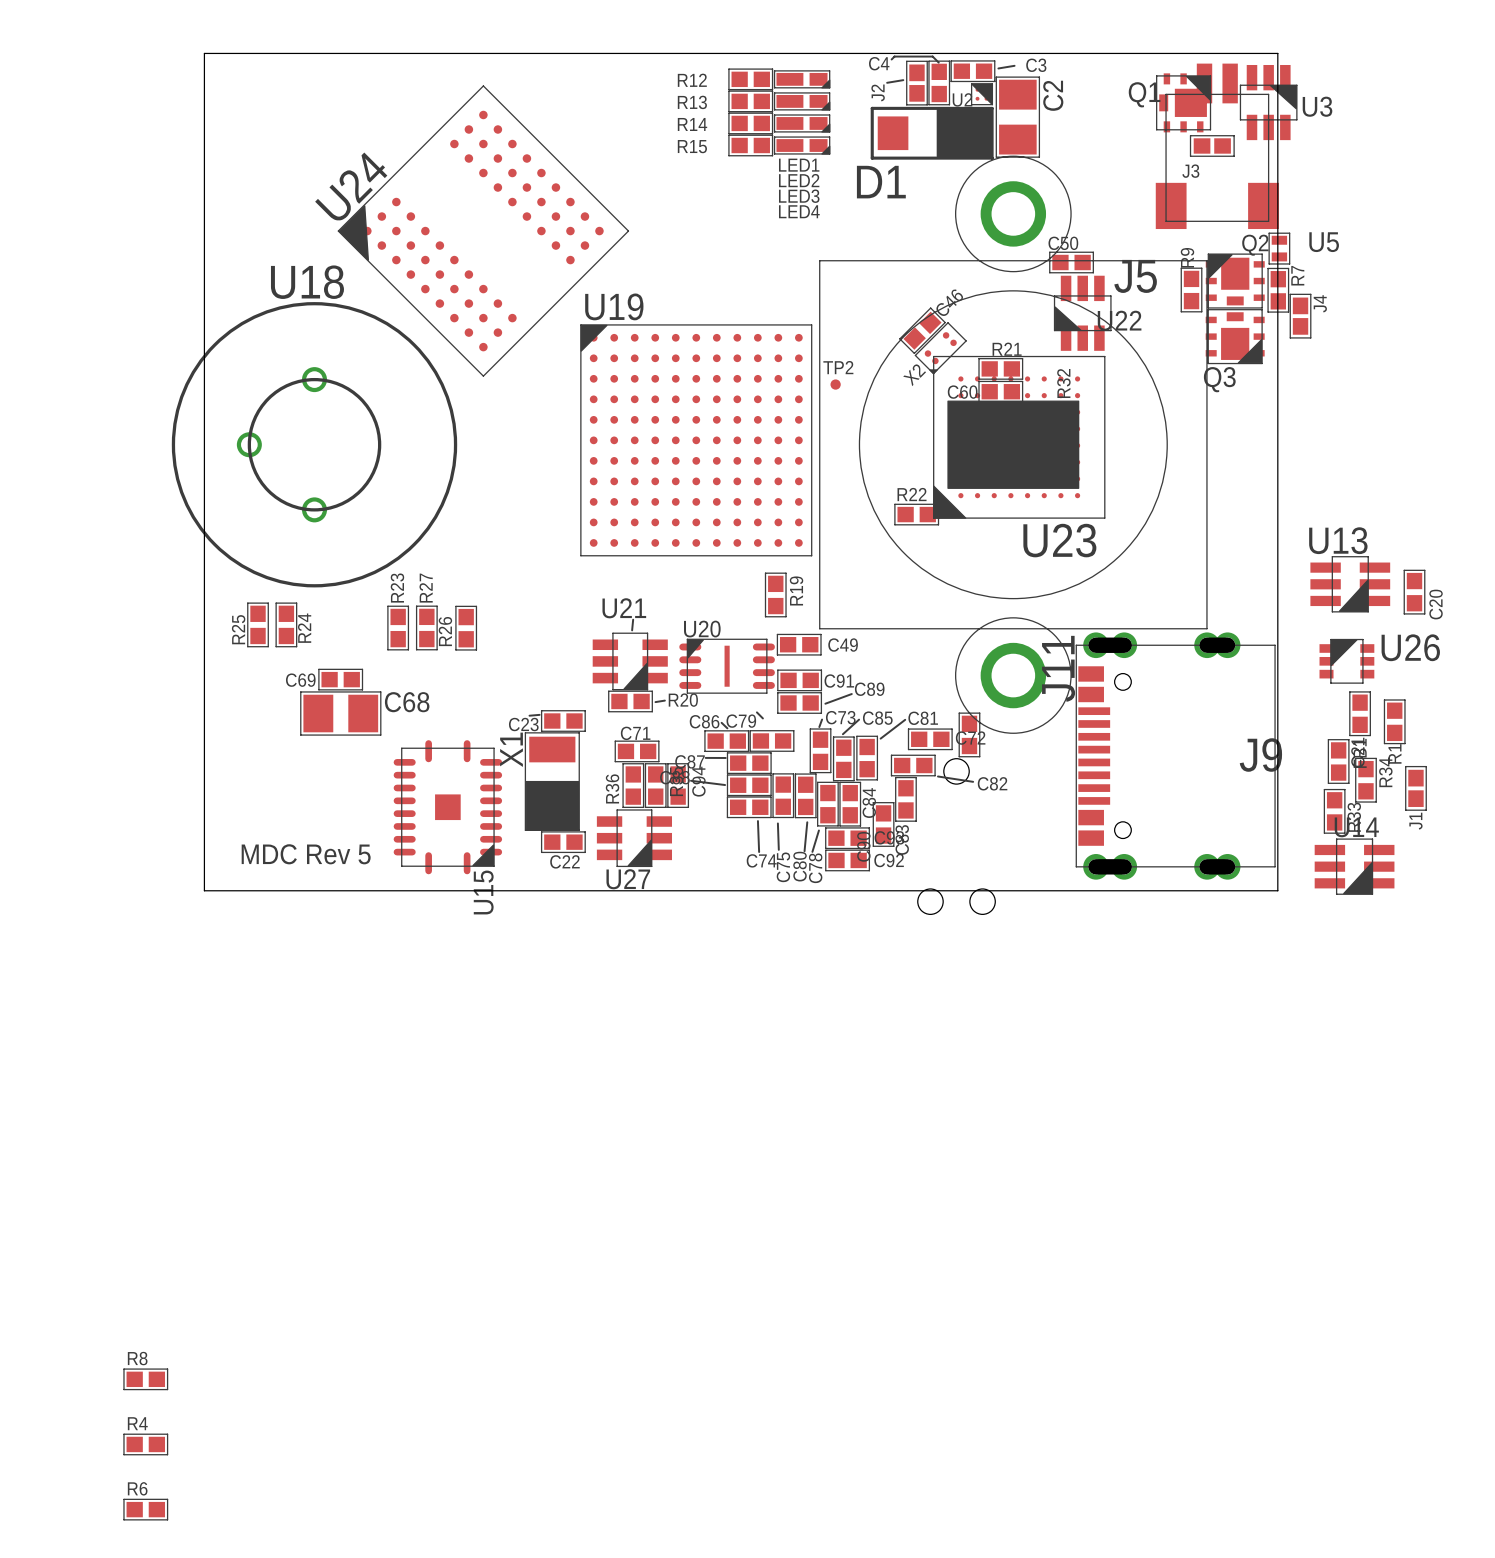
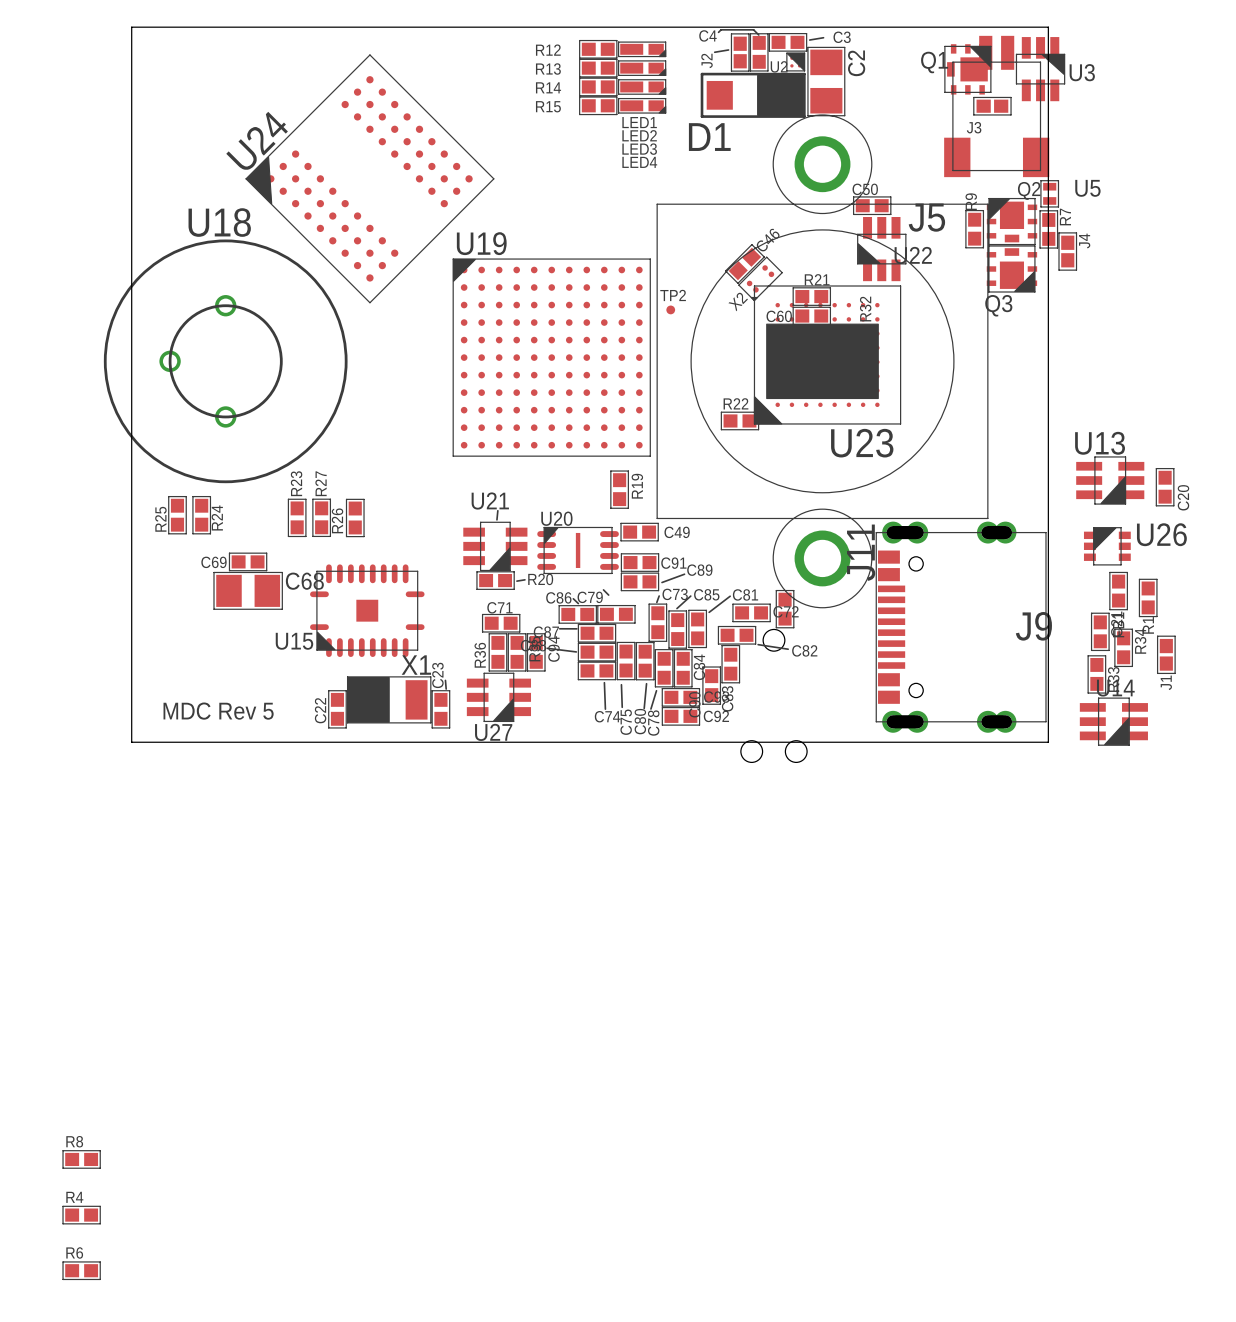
line: (539, 714) (529, 715) -> none
C23 rotation: 0° (563, 721) -> 90° clockwise (440, 709)
C23 position: (563, 721) -> (440, 709)
X1 rotation: 0° (552, 781) -> 90° clockwise (389, 699)
X1 position: (552, 781) -> (389, 699)
U15 rotation: 0° (447, 807) -> 90° clockwise (367, 610)
line: none -> (445, 680) (446, 689)
C22 rotation: 0° (563, 842) -> 90° clockwise (337, 709)
C22 position: (563, 842) -> (337, 709)

